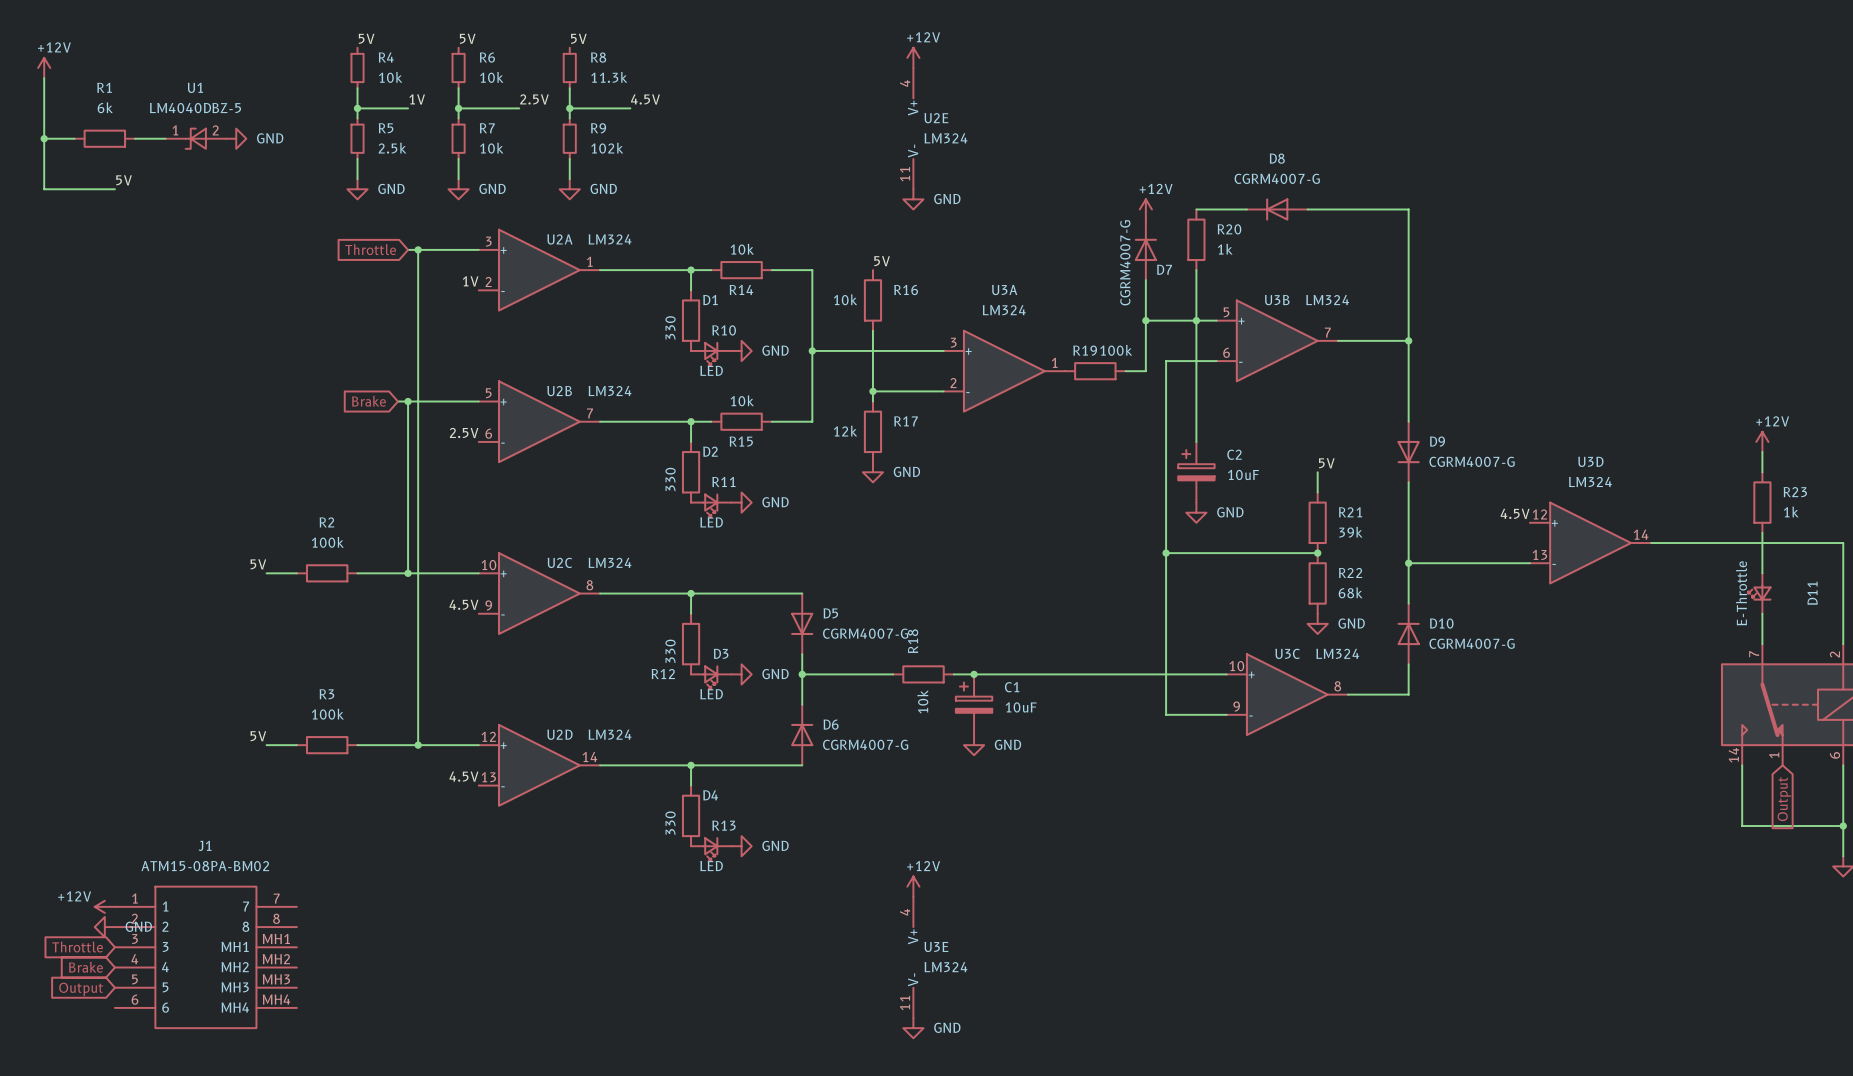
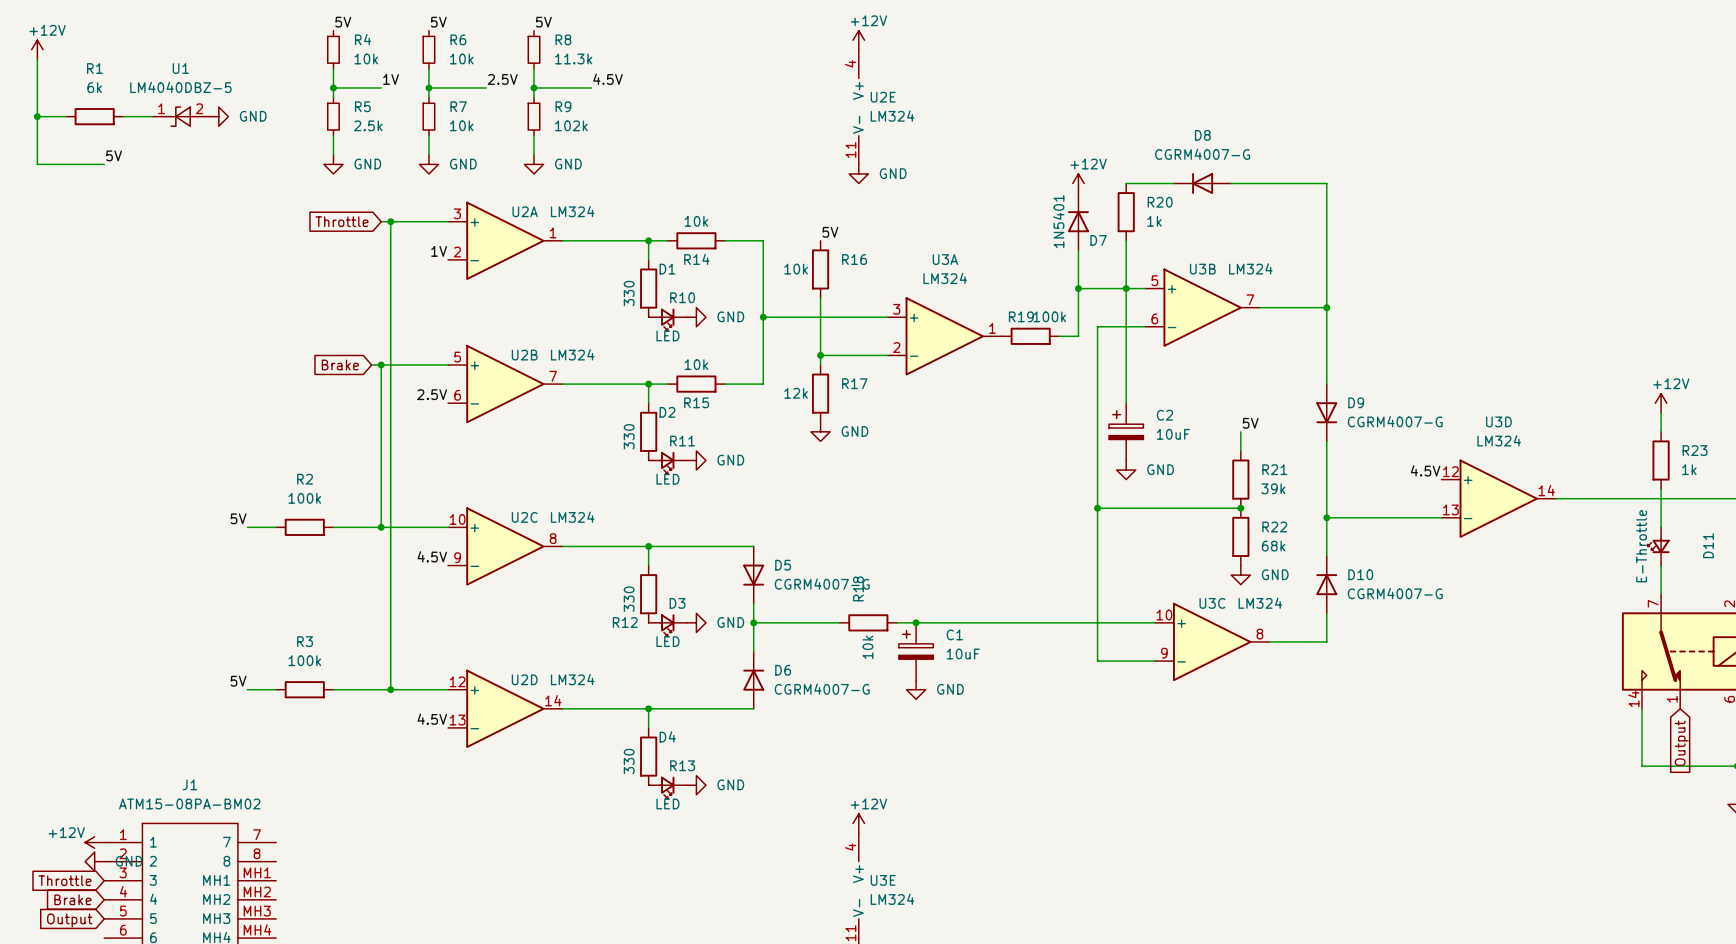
D7 value: CGRM4007-G (1125, 262) -> 1N5401 (1058, 221)

